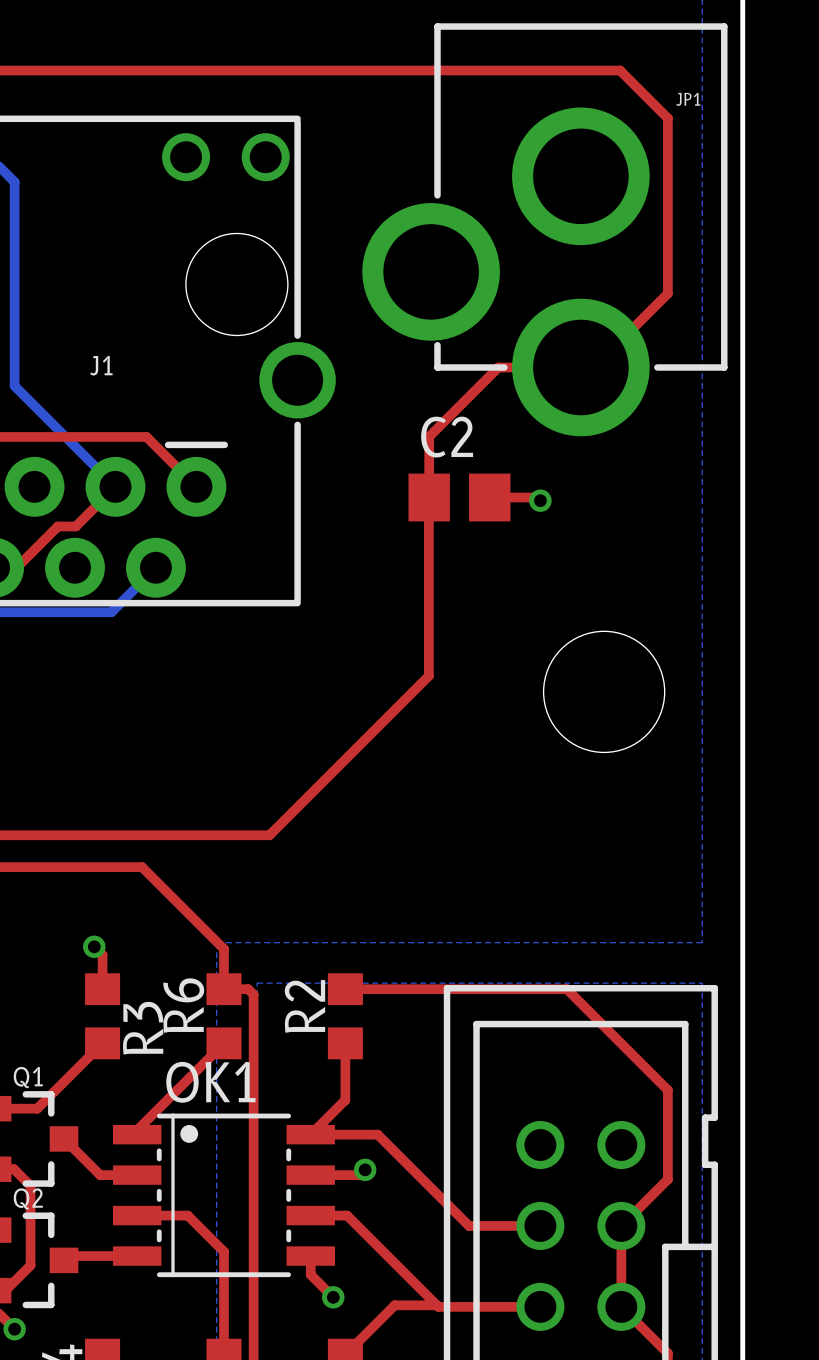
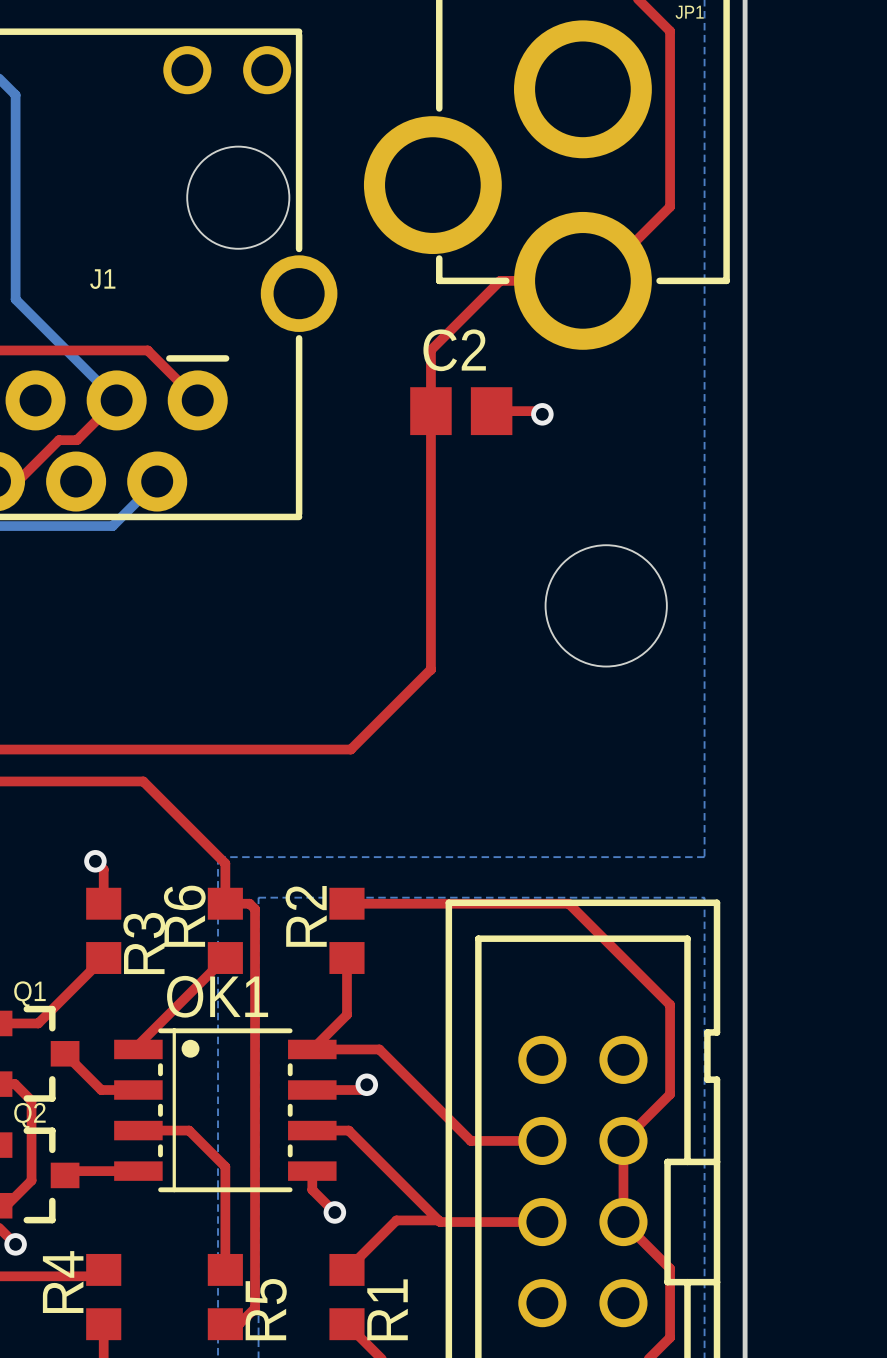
top track: (428, 494) (428, 675) (269, 835) -> (430, 669) (350, 749) (271, 749)
top track: none -> (430, 411) (430, 670)

